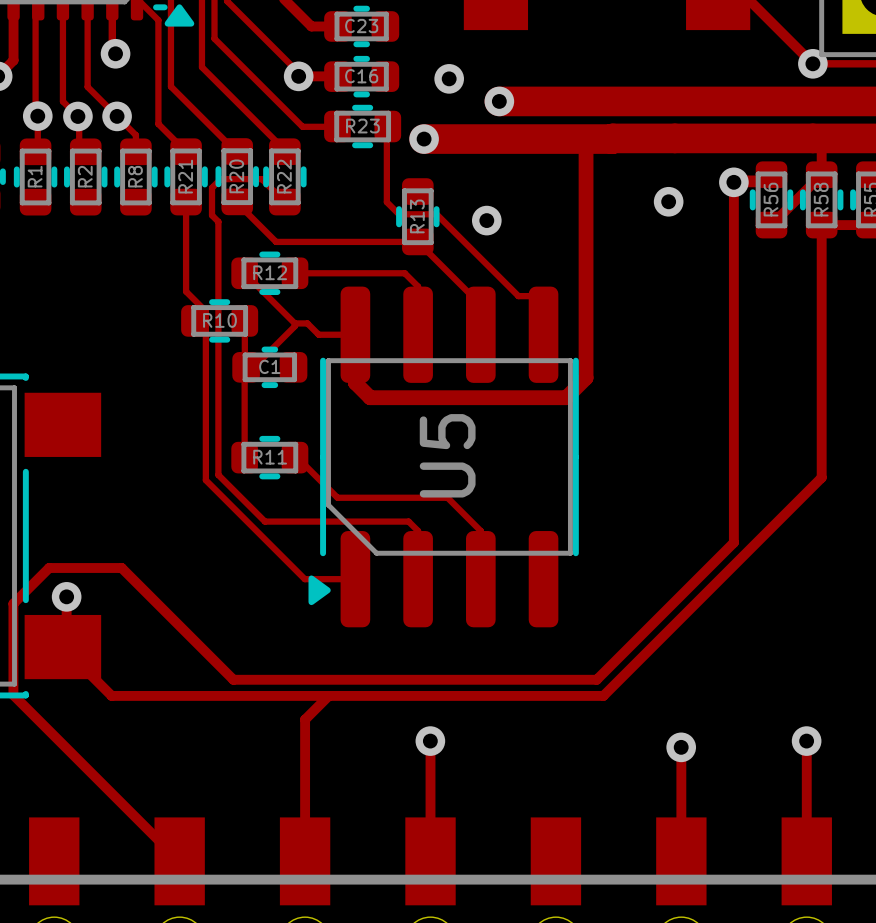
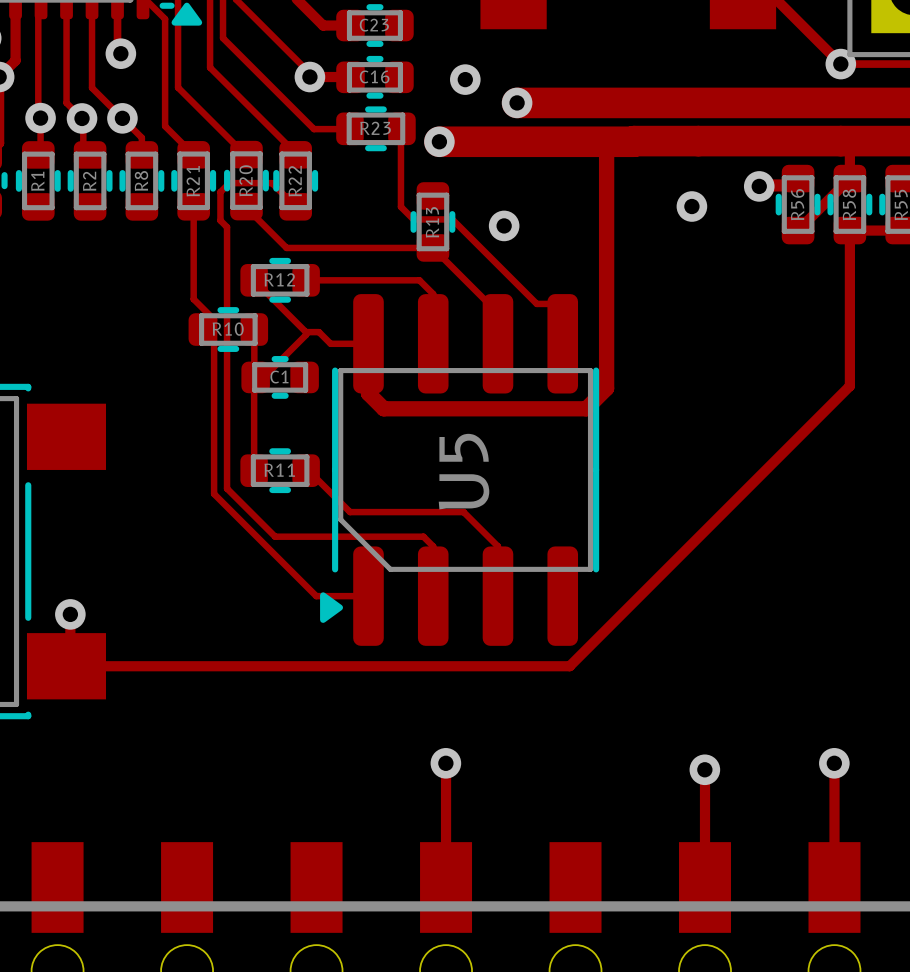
track: (733, 182) (733, 542) (596, 679) (233, 679) (121, 568) (49, 568) (13, 603) (13, 695) (179, 861) -> none
track: (821, 375) (821, 477) (603, 695) (111, 695) (62, 647) -> (849, 386) (569, 666) (66, 666)
track: (328, 695) (305, 719) (305, 861) -> none

